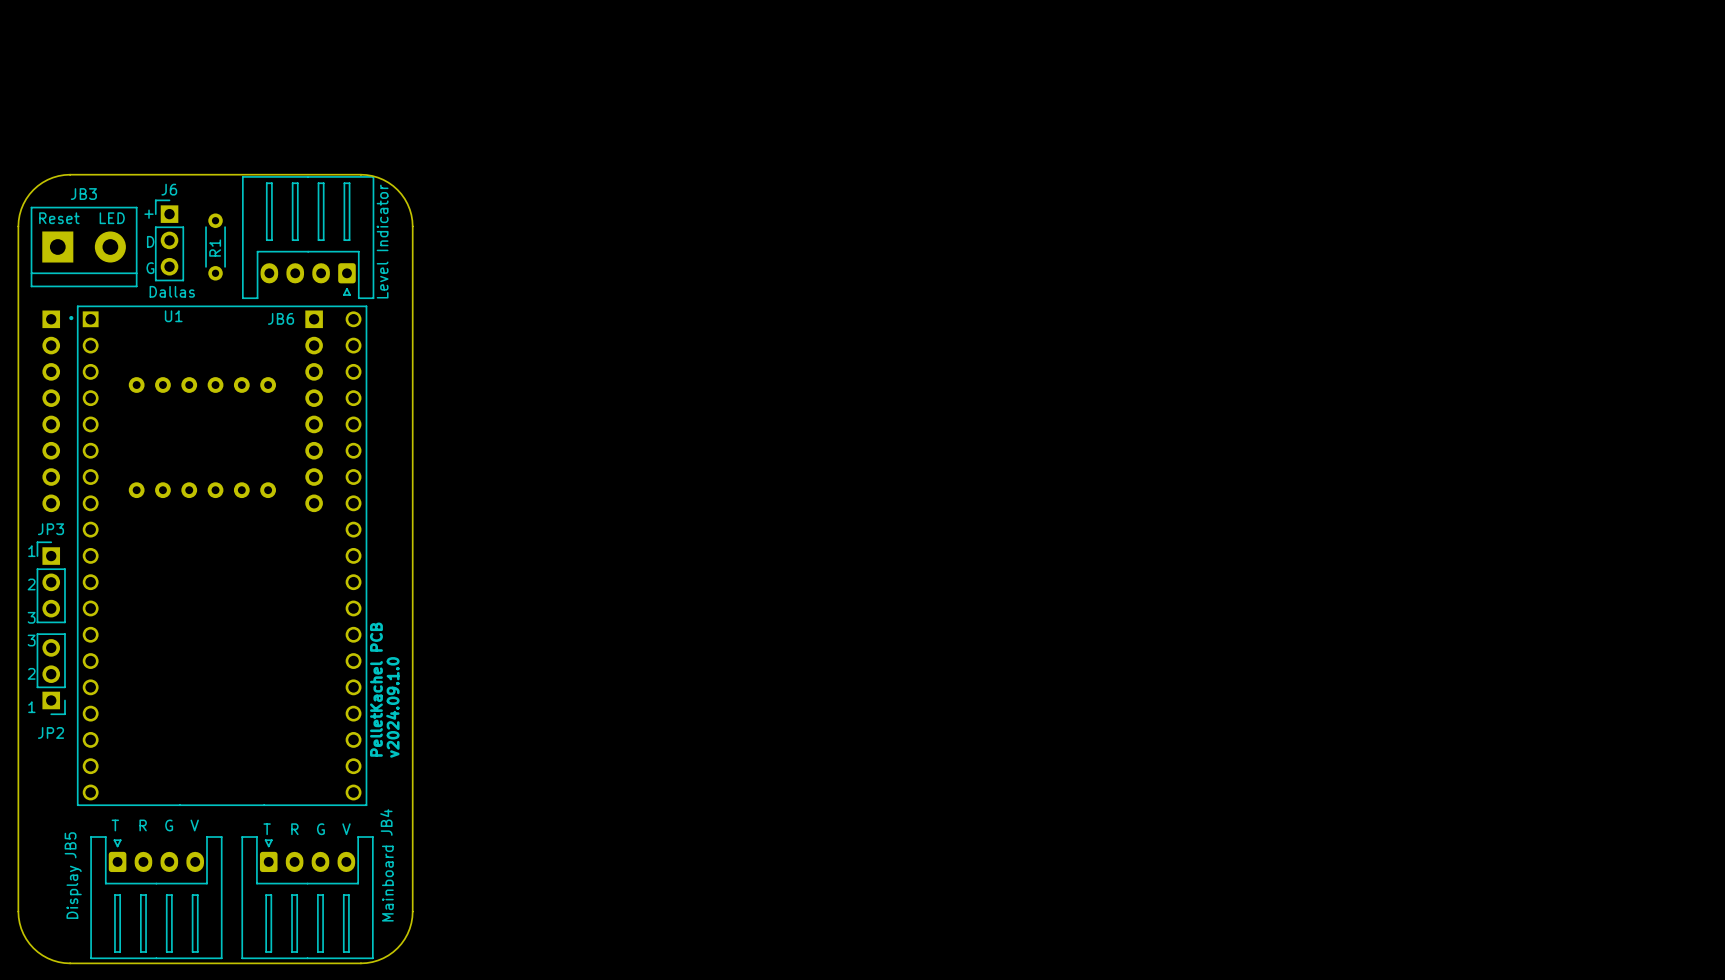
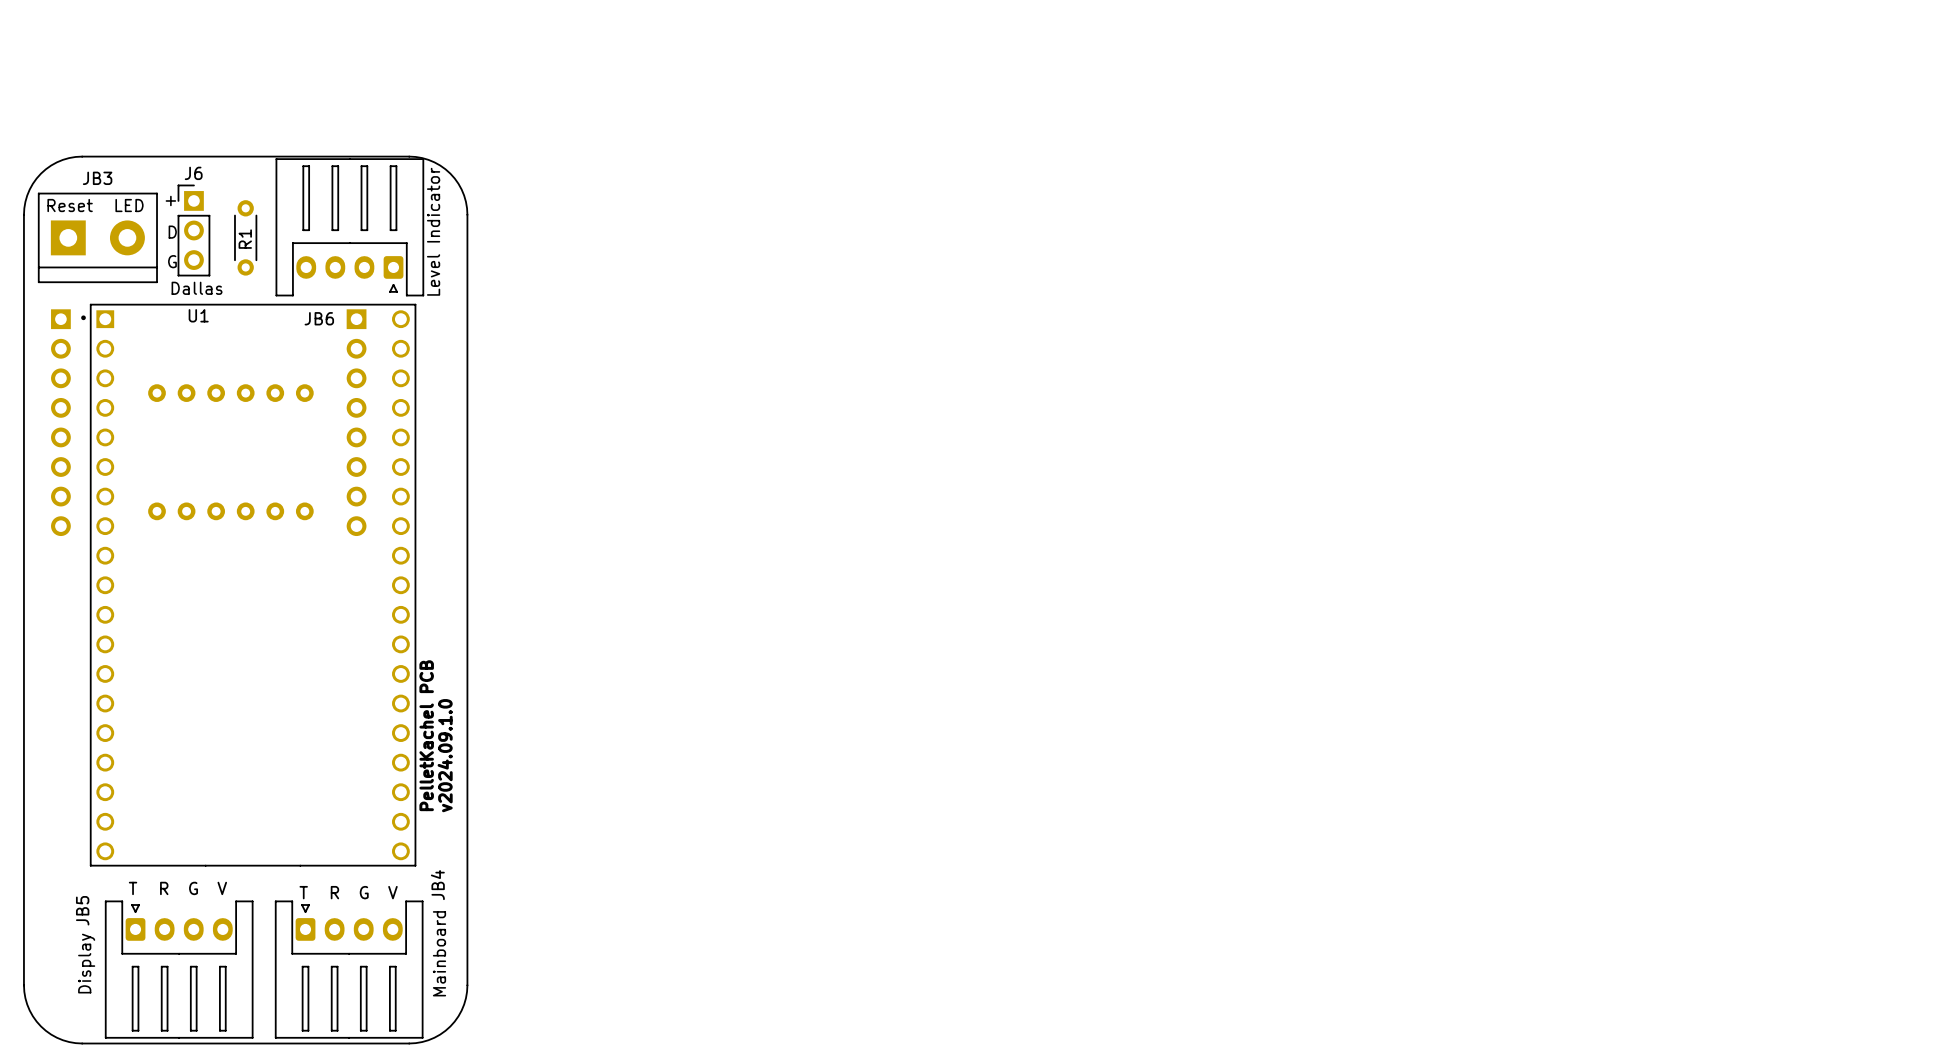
text: 1 (31, 551) -> none
JP3: (51, 582) -> none
text: 2 (31, 584) -> none
text: 3 (31, 617) -> none
text: 3 (31, 640) -> none
text: 2 (31, 673) -> none
JP2: (51, 674) -> none
text: 1 (31, 707) -> none

